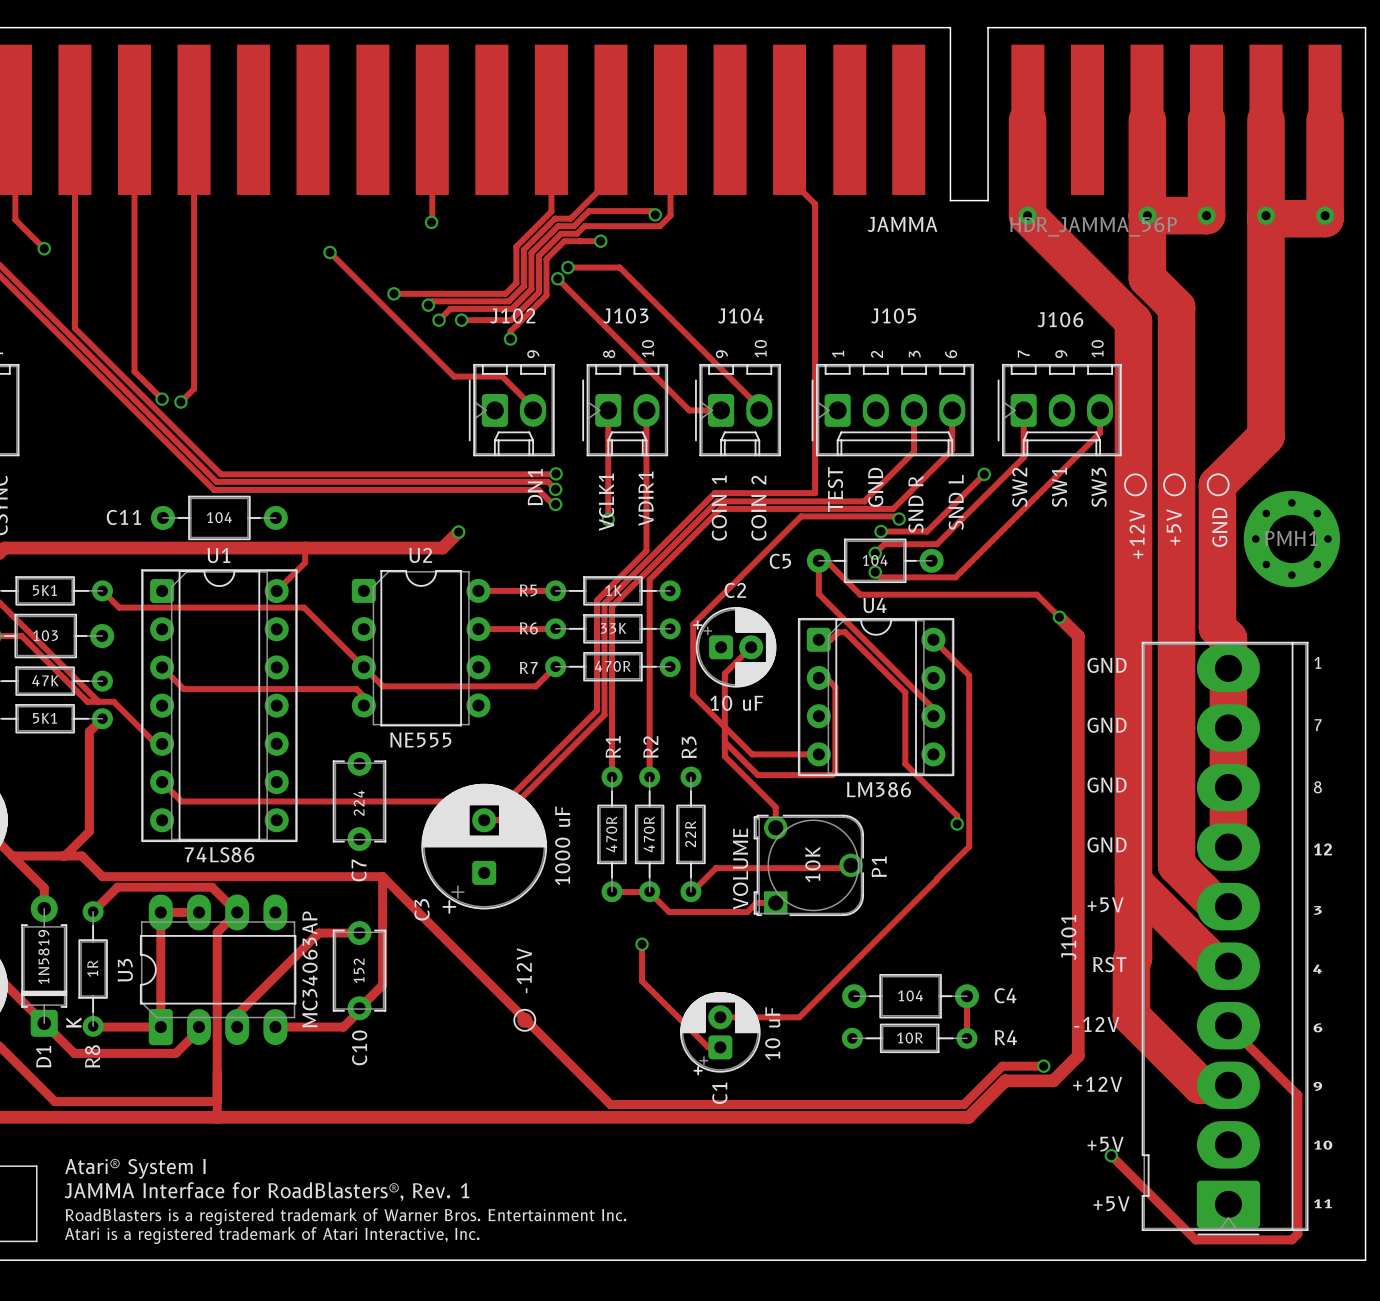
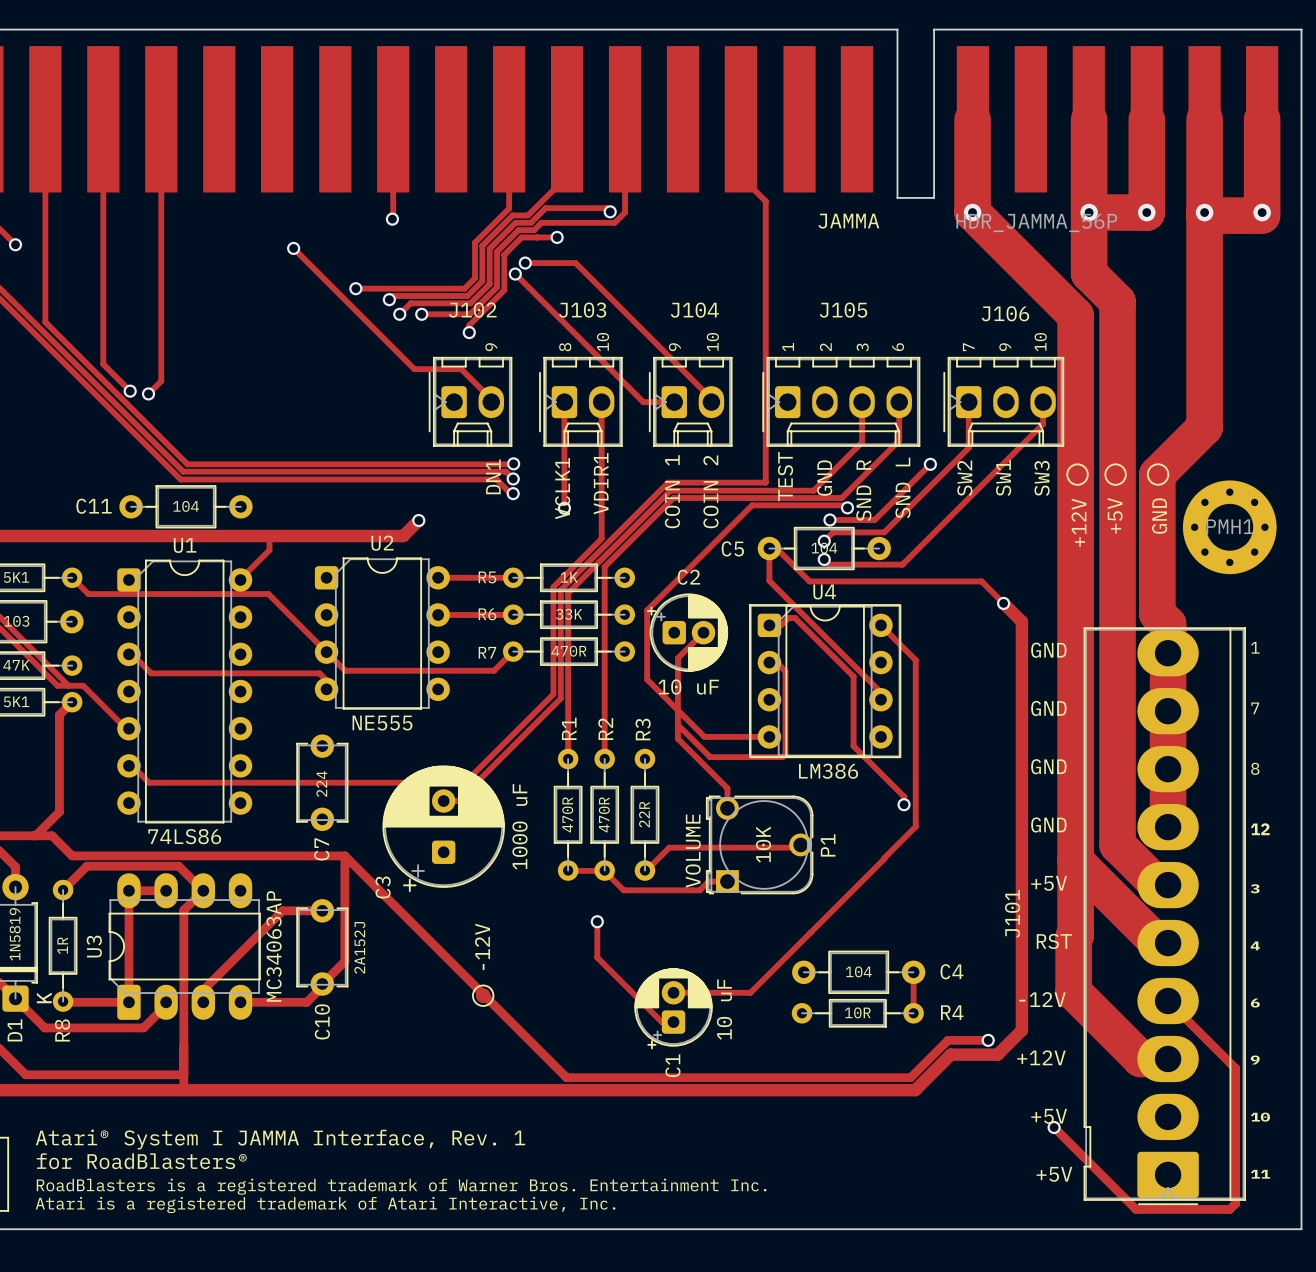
U1 footprint: [141, 569, 298, 843] -> [117, 559, 253, 824]
C10 value: 152 (359, 970) -> 2A152J (359, 947)
text: Atari® System I (135, 1168) -> Atari® System I JAMMA Interface, Rev. 1 (280, 1139)
text: JAMMA Interface for RoadBlasters®, Rev. 1 (266, 1191) -> for RoadBlasters® (141, 1161)

